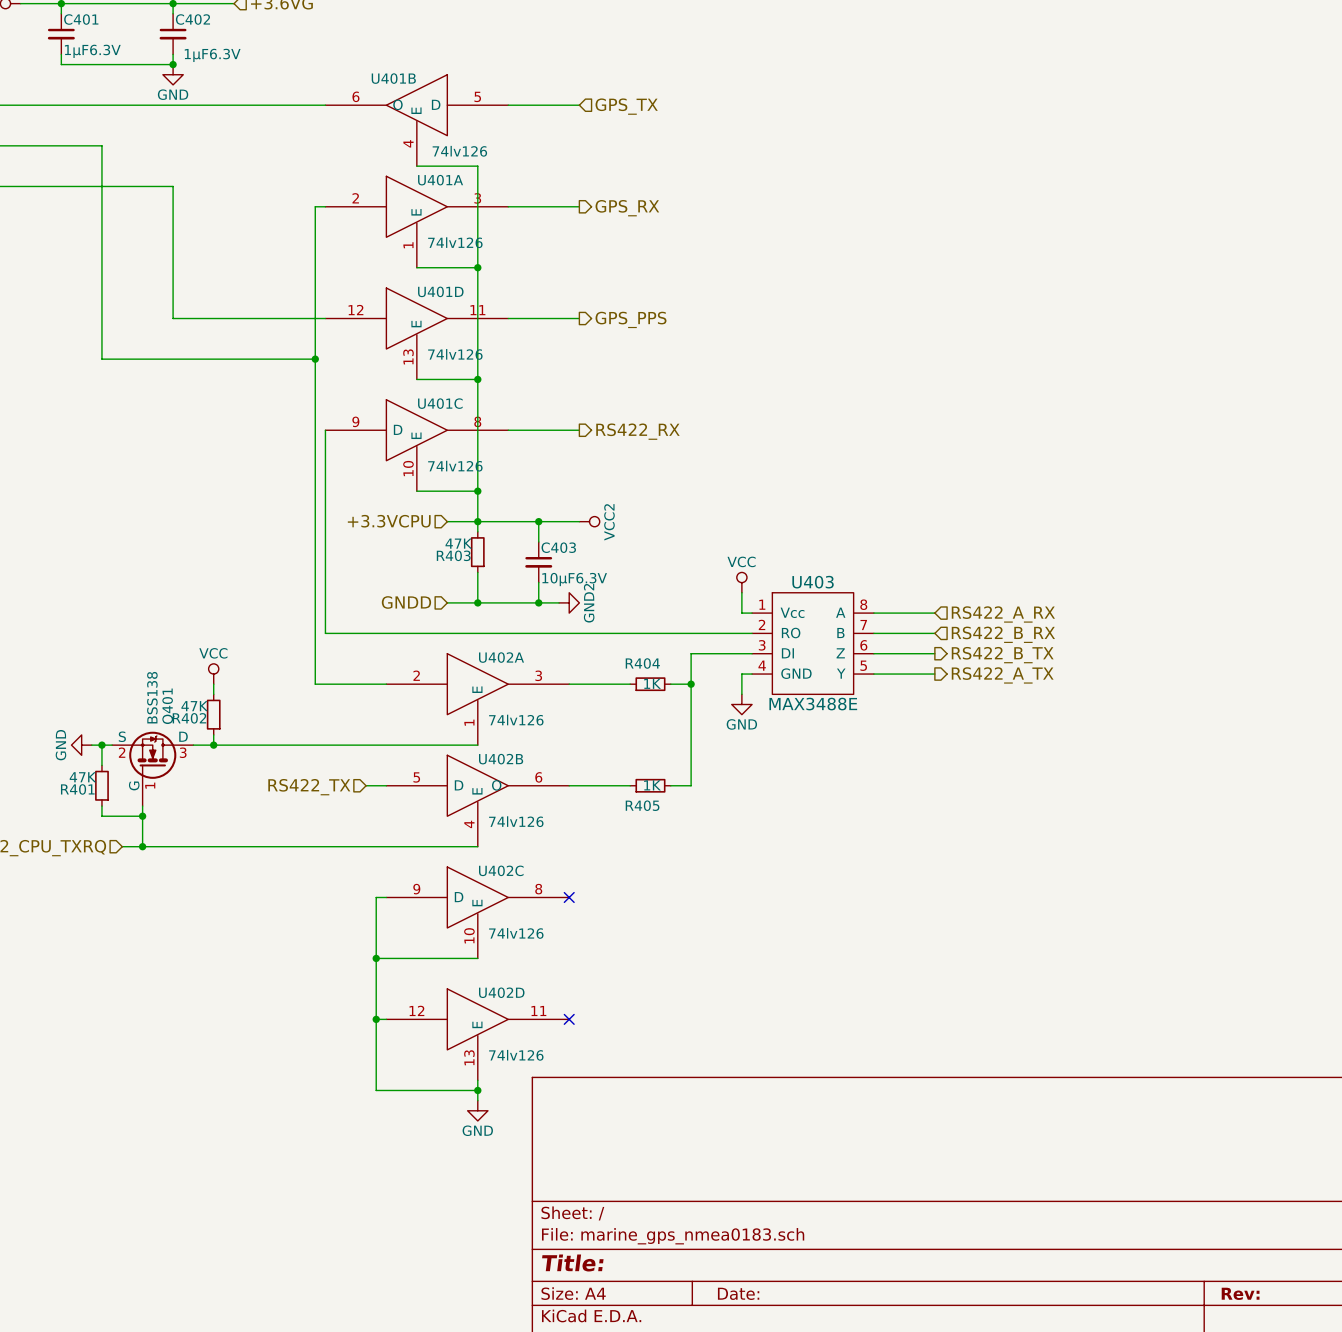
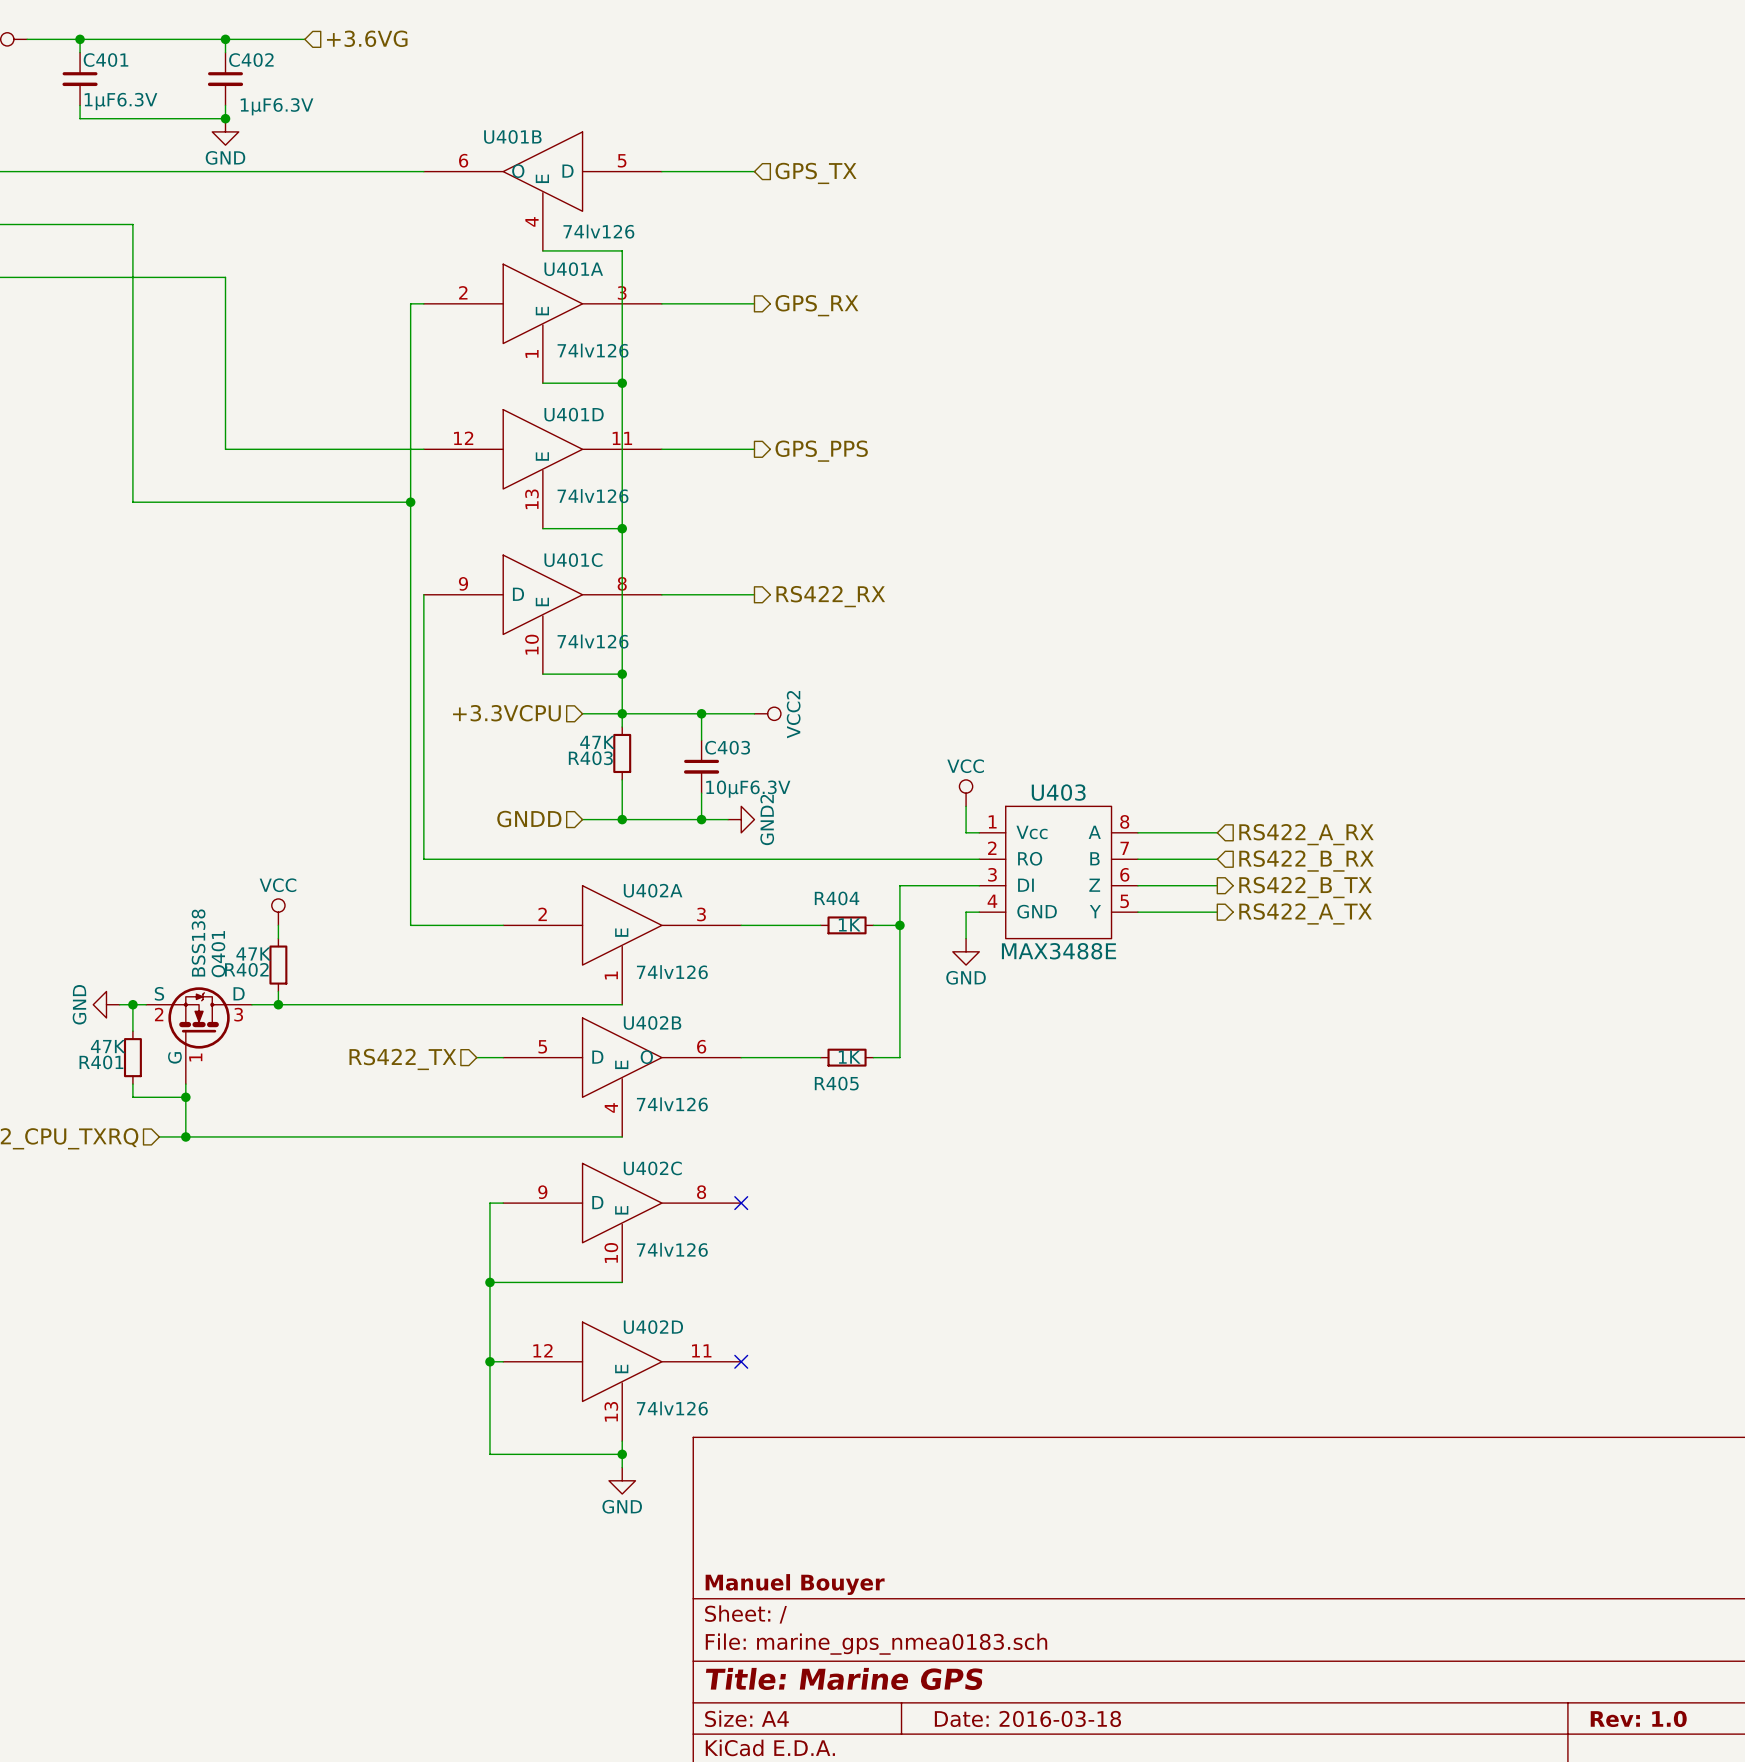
title block: none -> Manuel Bouyer (795, 1584)
title block: Title: (572, 1262) -> Title: Marine GPS (844, 1678)
title block: Date: (738, 1293) -> Date: 2016-03-18 (1027, 1718)
title block: Rev: (1240, 1293) -> Rev: 1.0 (1638, 1718)

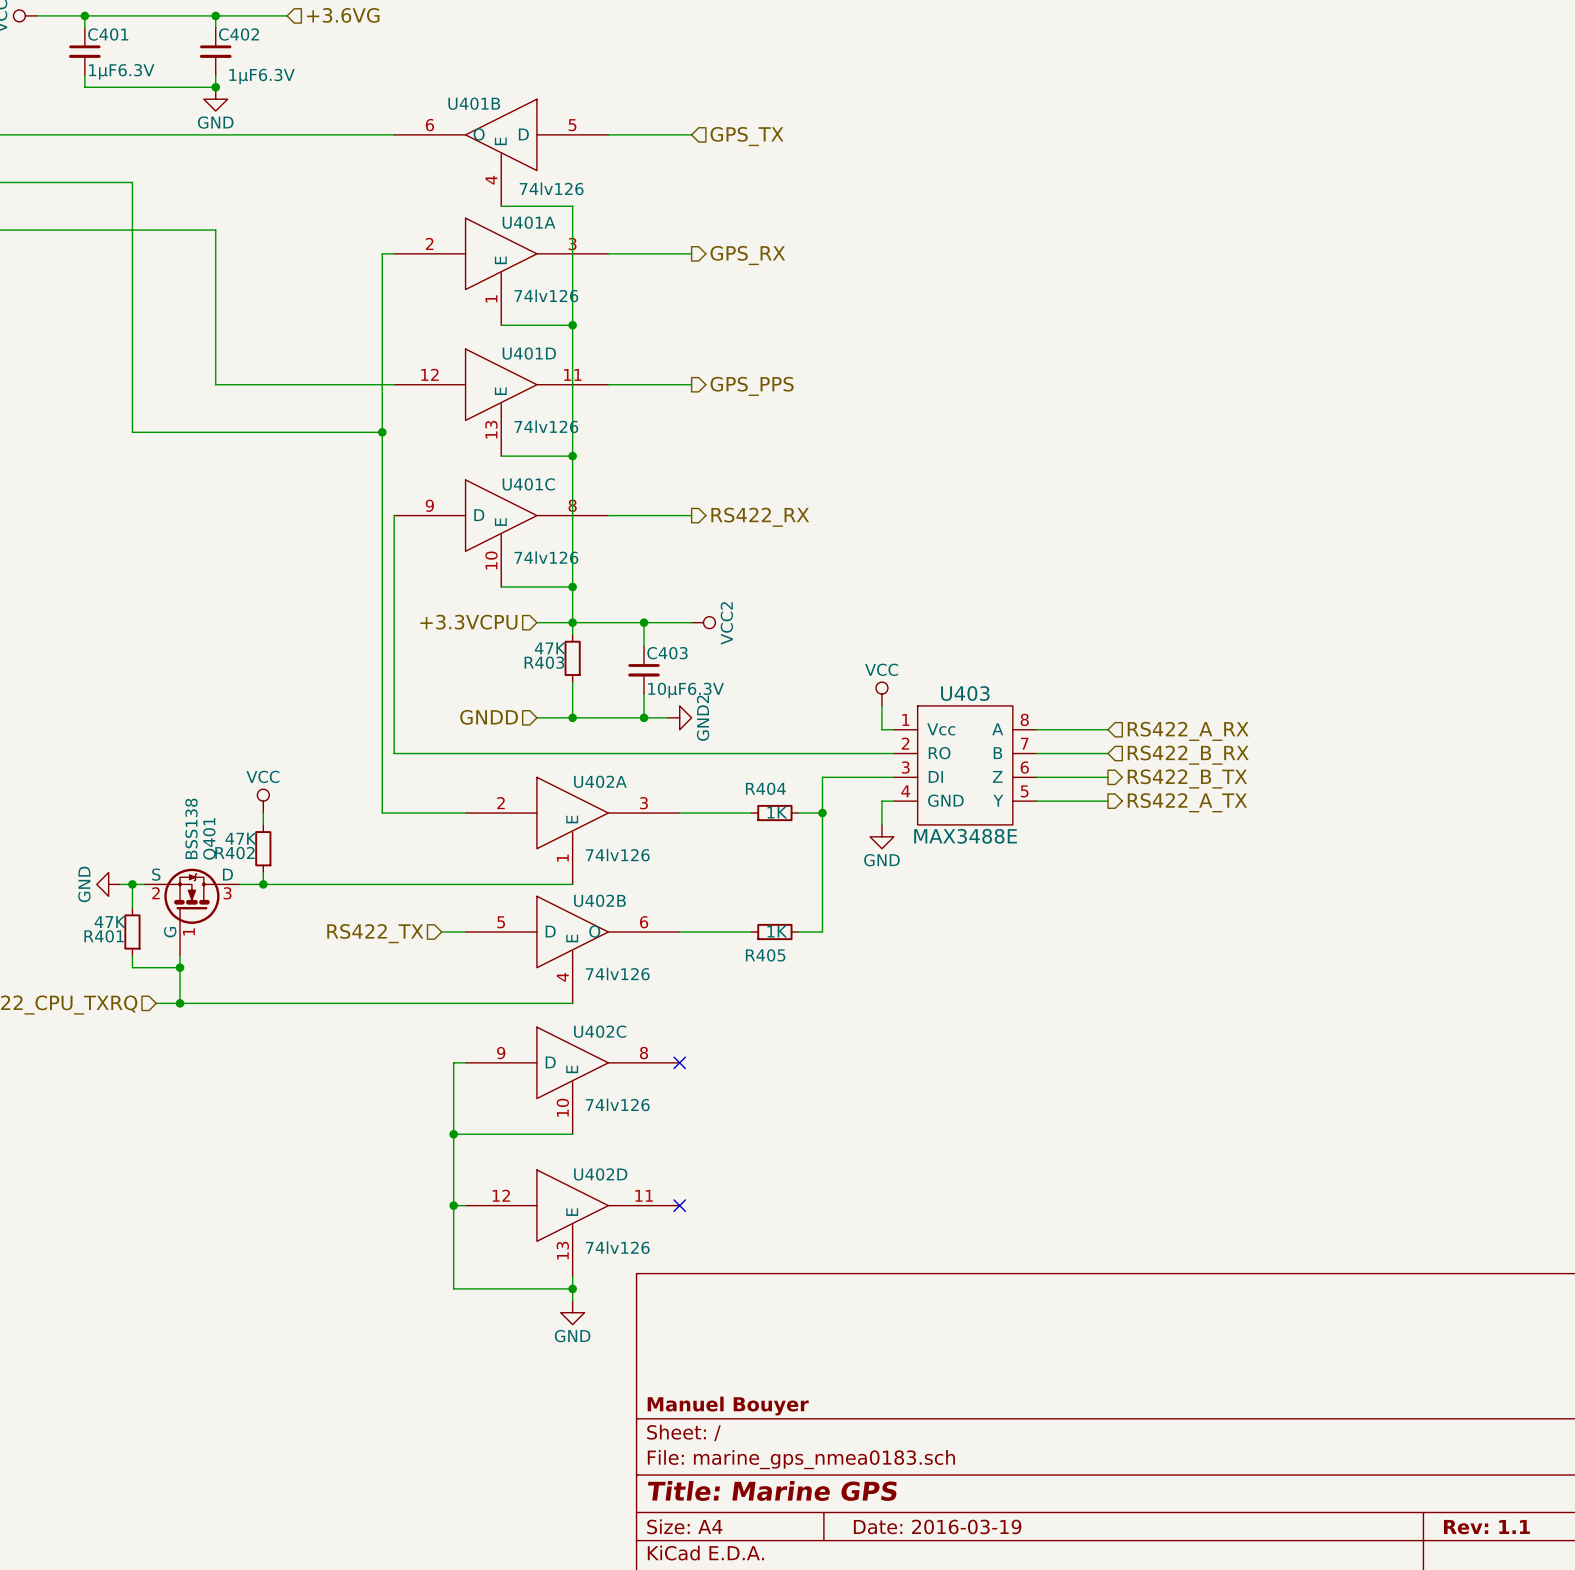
title block: Date: 2016-03-18 (1027, 1718) -> Date: 2016-03-19 (937, 1526)
title block: Rev: 1.0 (1638, 1718) -> Rev: 1.1 (1486, 1527)

